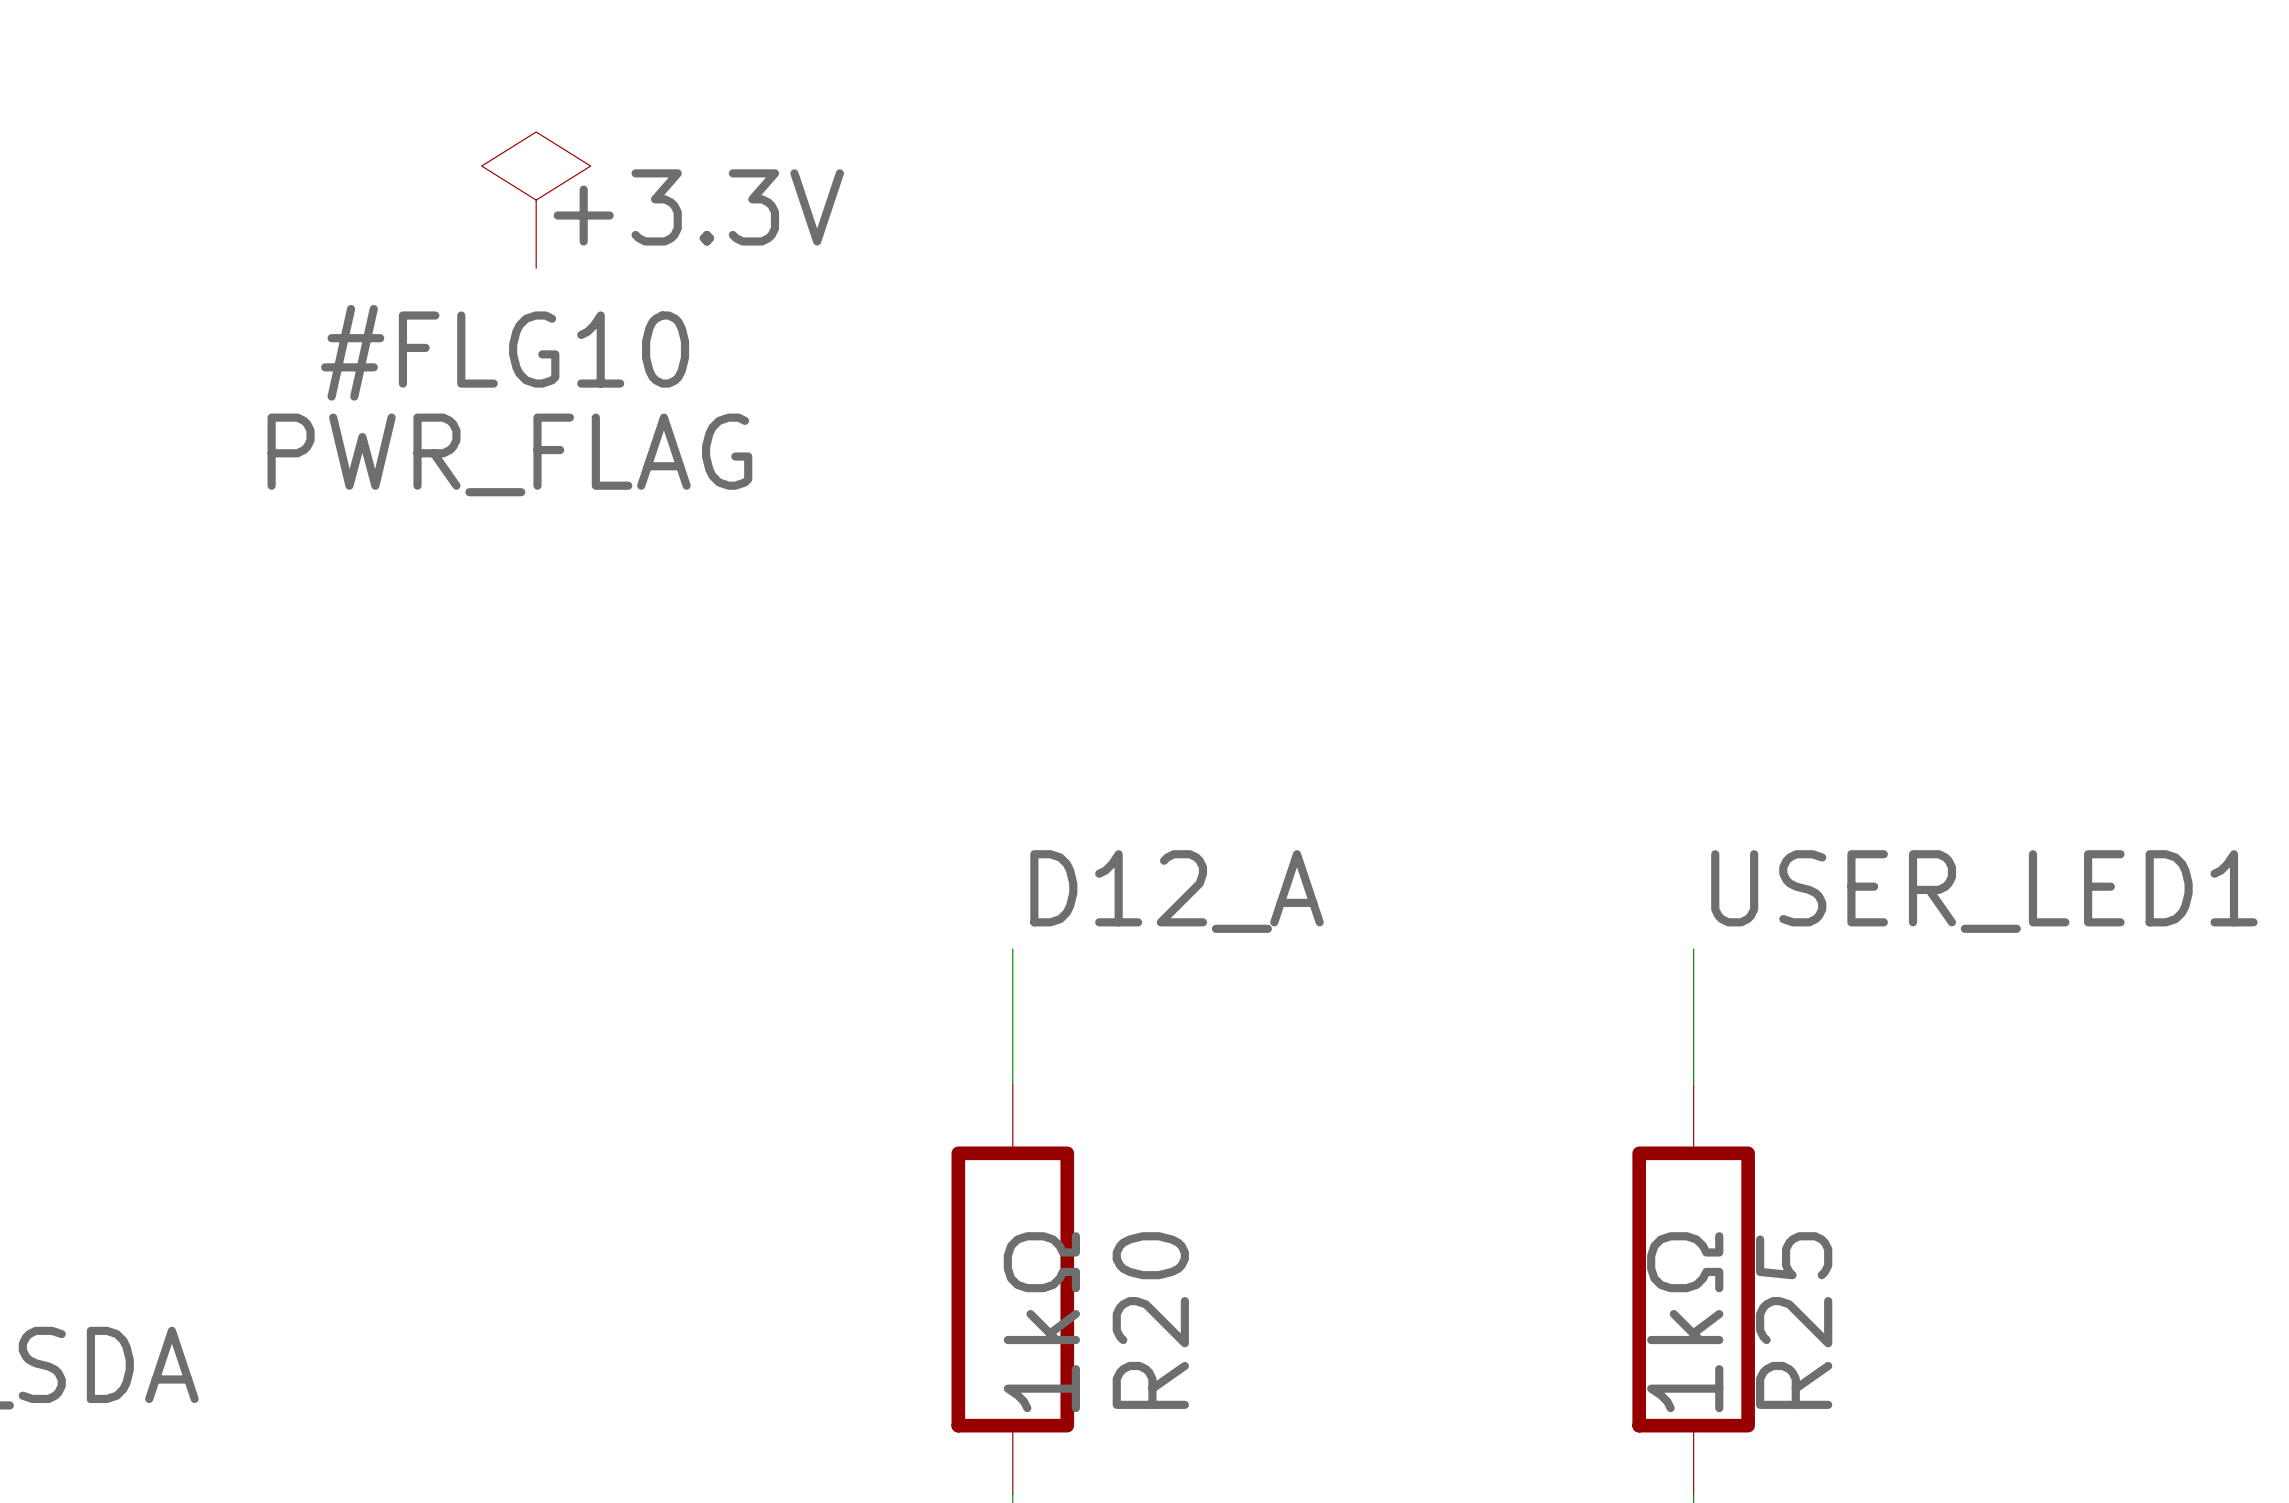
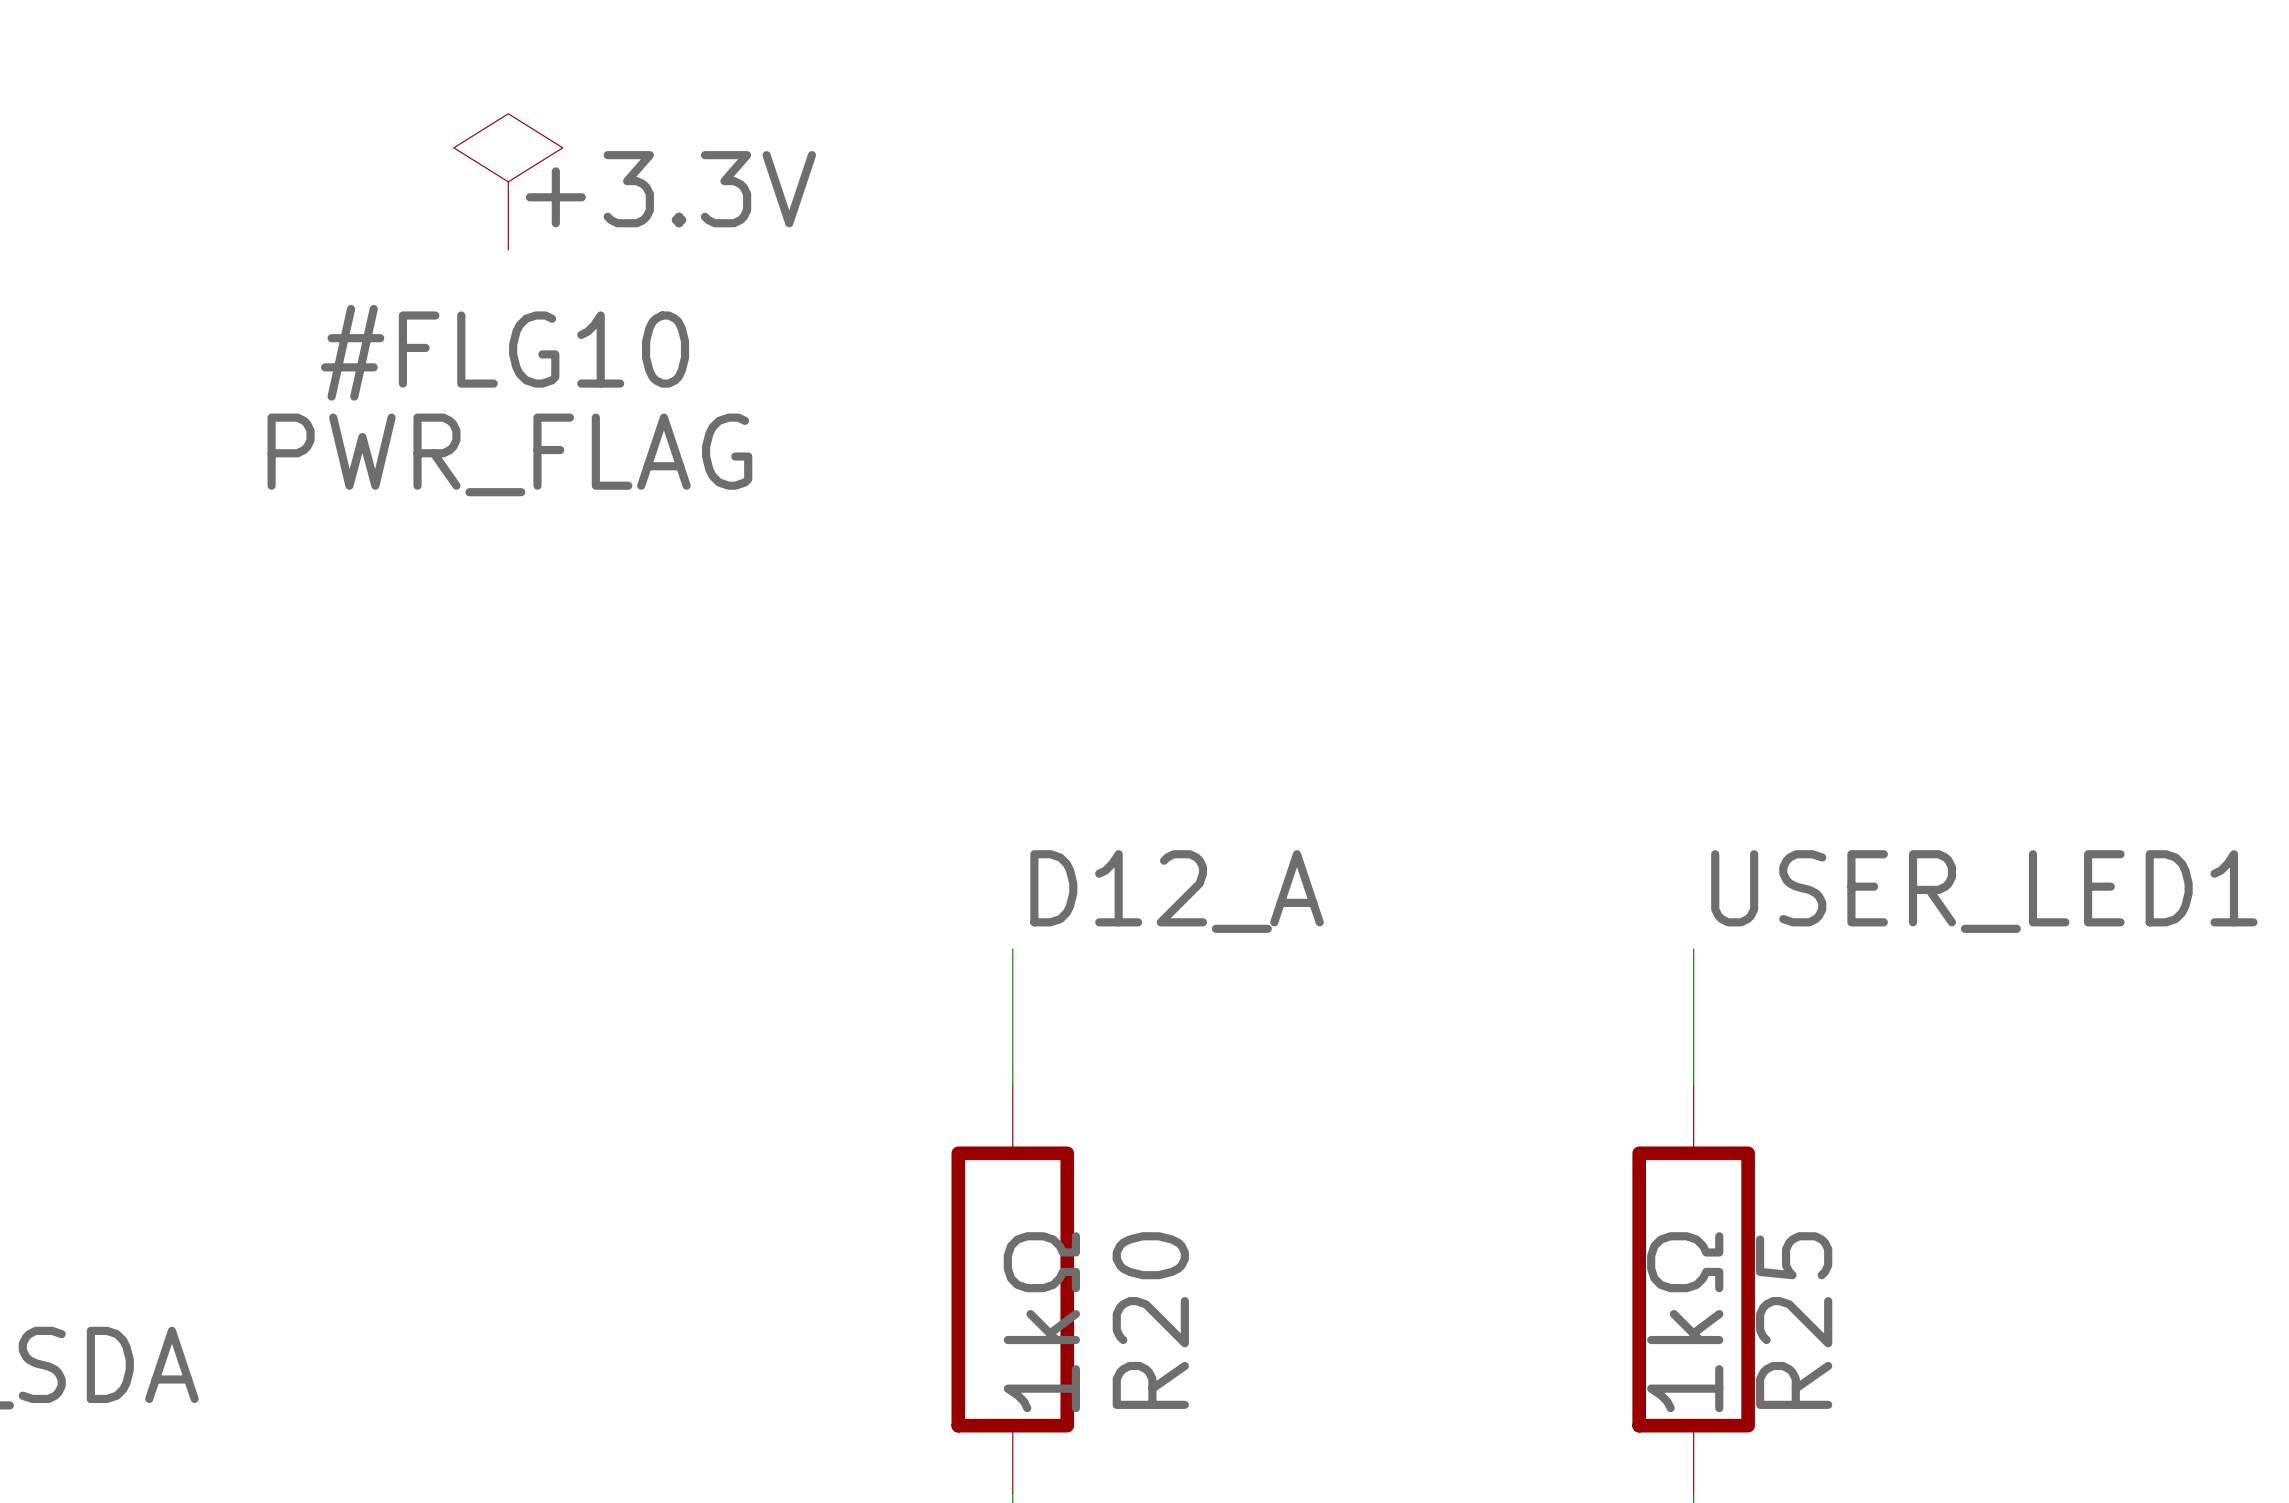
#FLG10 position: PWR_FLAG (536, 200) -> PWR_FLAG (508, 181)
label position: +3.3V (698, 207) -> +3.3V (670, 189)

